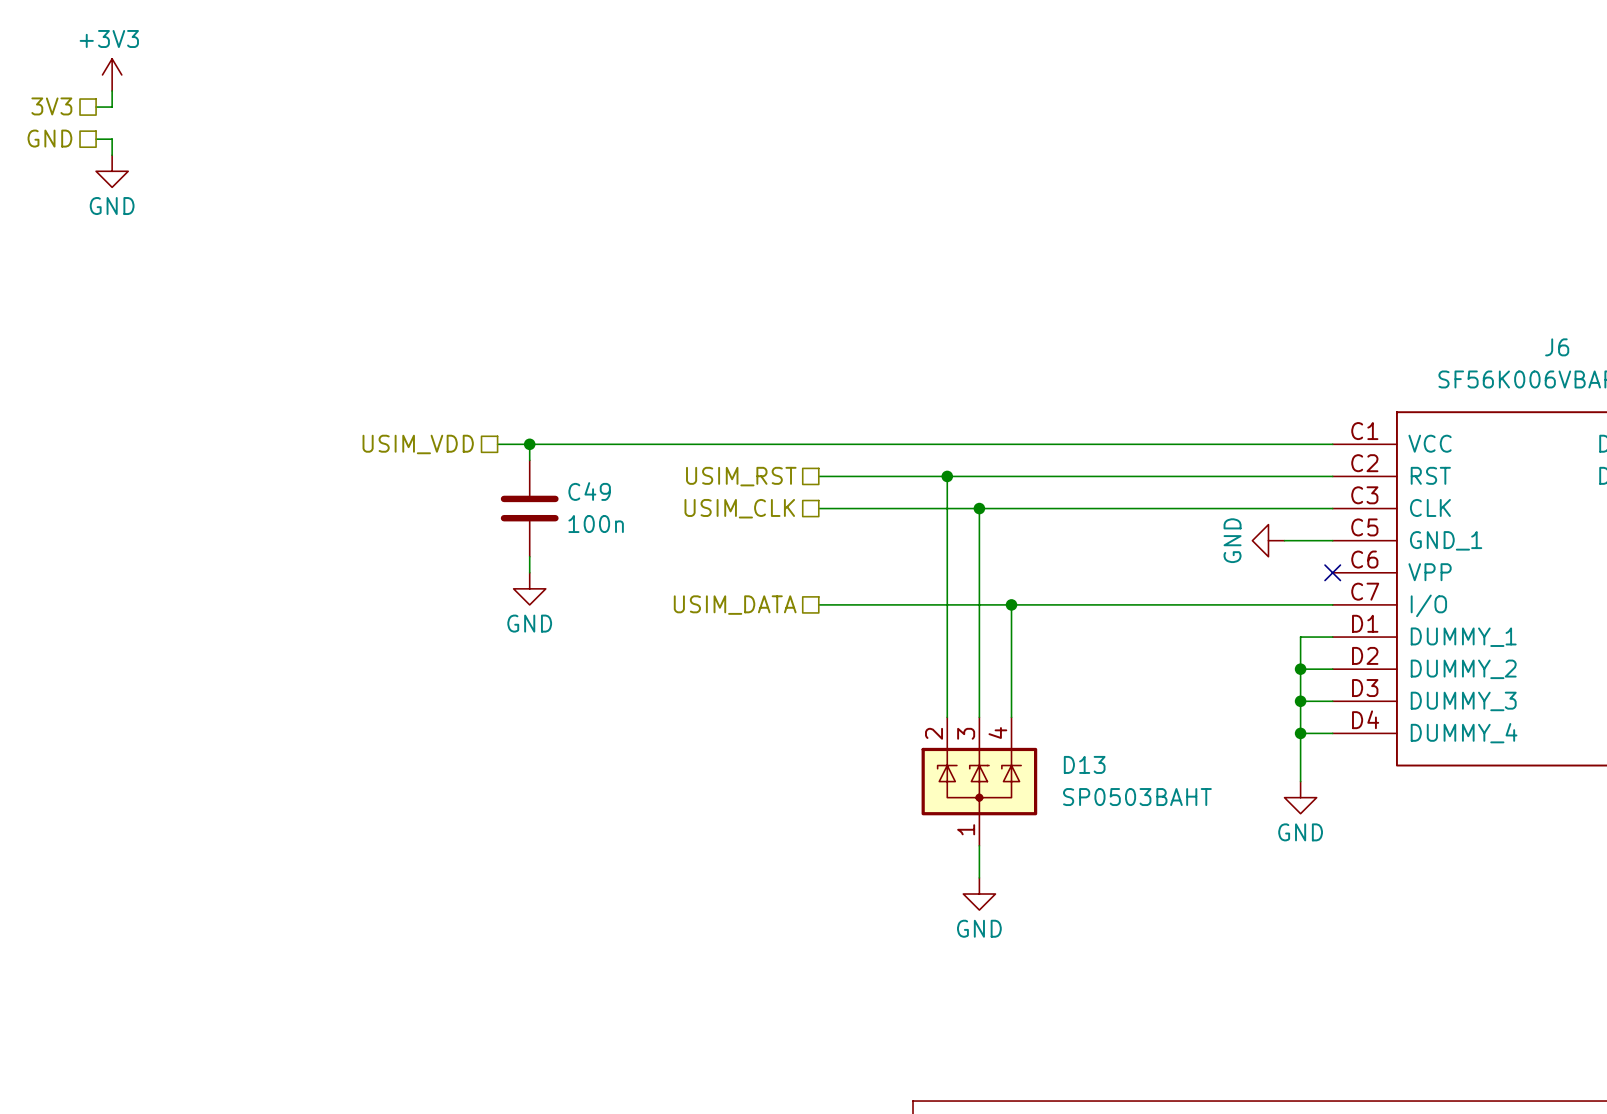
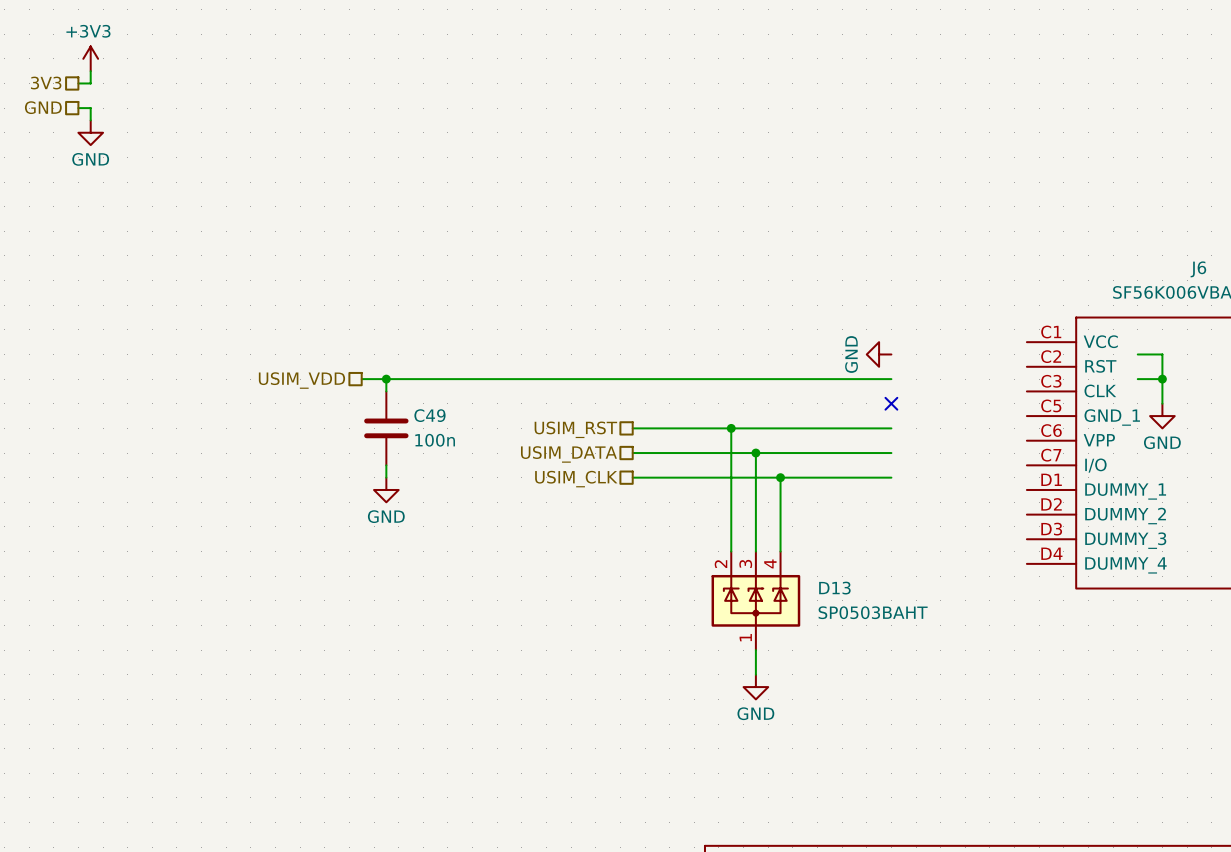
hierarchical label position: USIM_VDD (418, 444) -> USIM_VDD (301, 380)
wire: (497, 444) (1332, 444) -> none
wire: (529, 444) (529, 460) -> (386, 379) (386, 391)
junction position: (529, 444) -> (386, 379)
power symbol: none -> GND (879, 354)
wire: none -> (1137, 354) (1162, 354) (1162, 403)
hierarchical label position: USIM_RST (741, 476) -> USIM_RST (575, 429)
wire: (818, 476) (1332, 476) -> none
wire: (947, 476) (947, 556) -> none
junction: (947, 476) -> none
wire: none -> (361, 379) (891, 379)
junction: none -> (1162, 379)
C49 position: (529, 508) -> (386, 428)
hierarchical label position: USIM_CLK (739, 508) -> USIM_CLK (576, 479)
wire: (818, 508) (1332, 508) -> none
wire: (979, 508) (979, 588) -> none
junction: (979, 508) -> none
no-connect mark: none -> (891, 403)
power symbol: GND (1268, 540) -> none
wire: (1284, 540) (1332, 540) -> none
power symbol: none -> GND (1162, 416)
wire: (529, 556) (529, 572) -> (386, 465) (386, 477)
wire: none -> (632, 428) (891, 428)
junction: none -> (731, 428)
no-connect mark: (1332, 572) -> none
power symbol position: GND (529, 588) -> GND (386, 489)
wire: none -> (632, 453) (891, 453)
junction: none -> (755, 453)
wire: (818, 604) (1332, 604) -> none
wire: (1011, 604) (1011, 620) -> none
junction position: (1011, 604) -> (780, 477)
hierarchical label position: USIM_DATA (735, 605) -> USIM_DATA (568, 454)
wire: none -> (632, 477) (891, 477)
wire: (1332, 637) (1300, 637) (1300, 781) -> none
wire: (1300, 669) (1332, 669) -> (1137, 379) (1162, 379)
junction: (1300, 669) -> none
wire: (1300, 701) (1332, 701) -> none
junction: (1300, 701) -> none
wire: (1300, 733) (1332, 733) -> none
junction: (1300, 733) -> none
power symbol: GND (1300, 797) -> none

